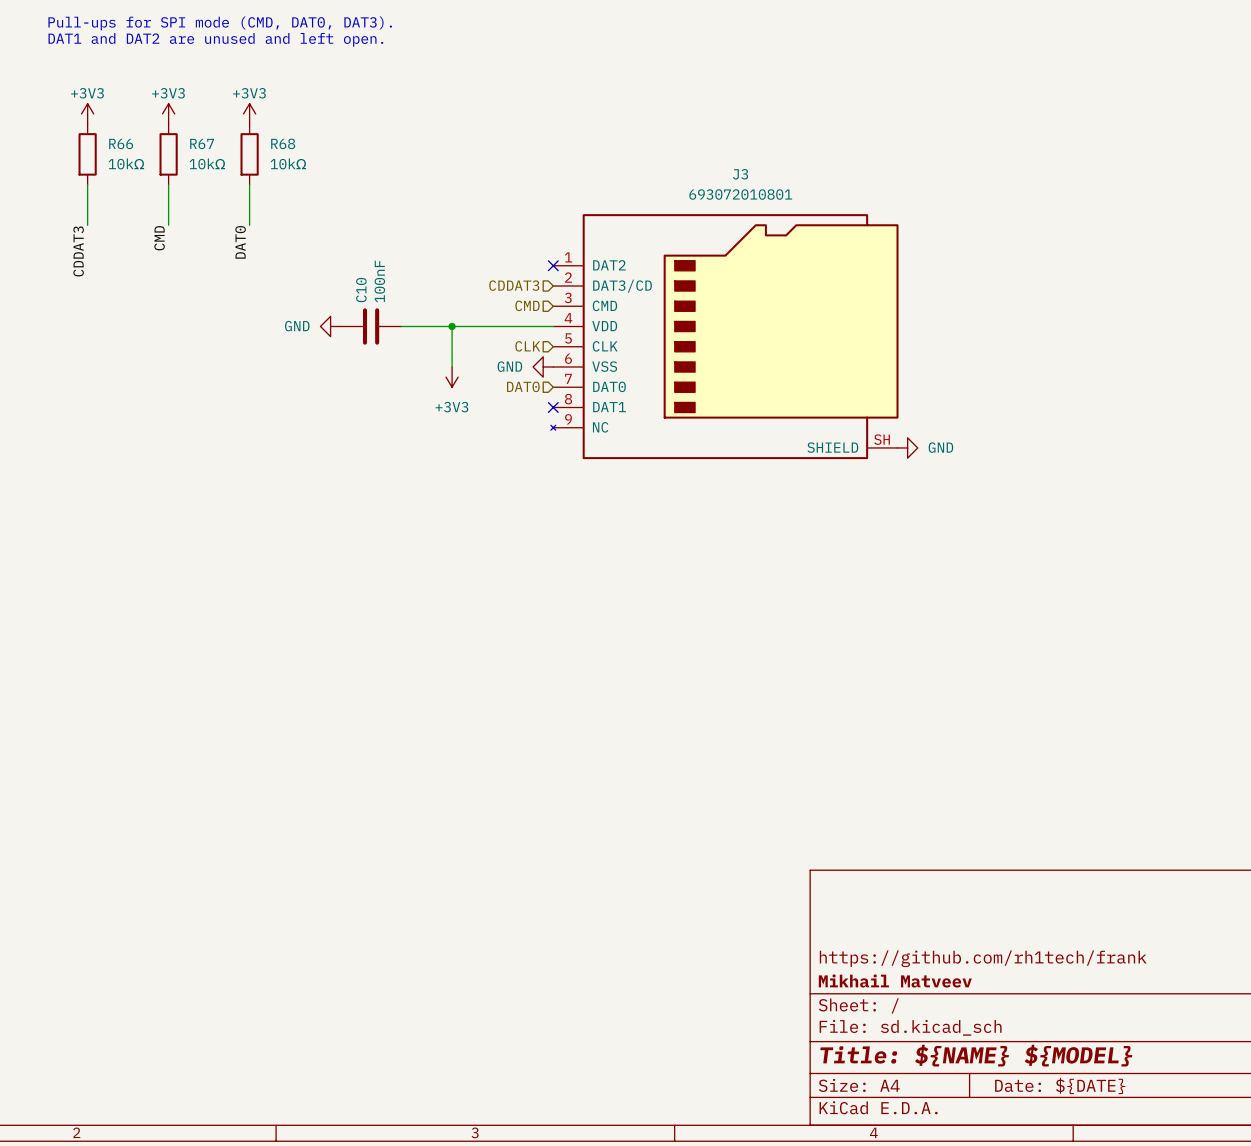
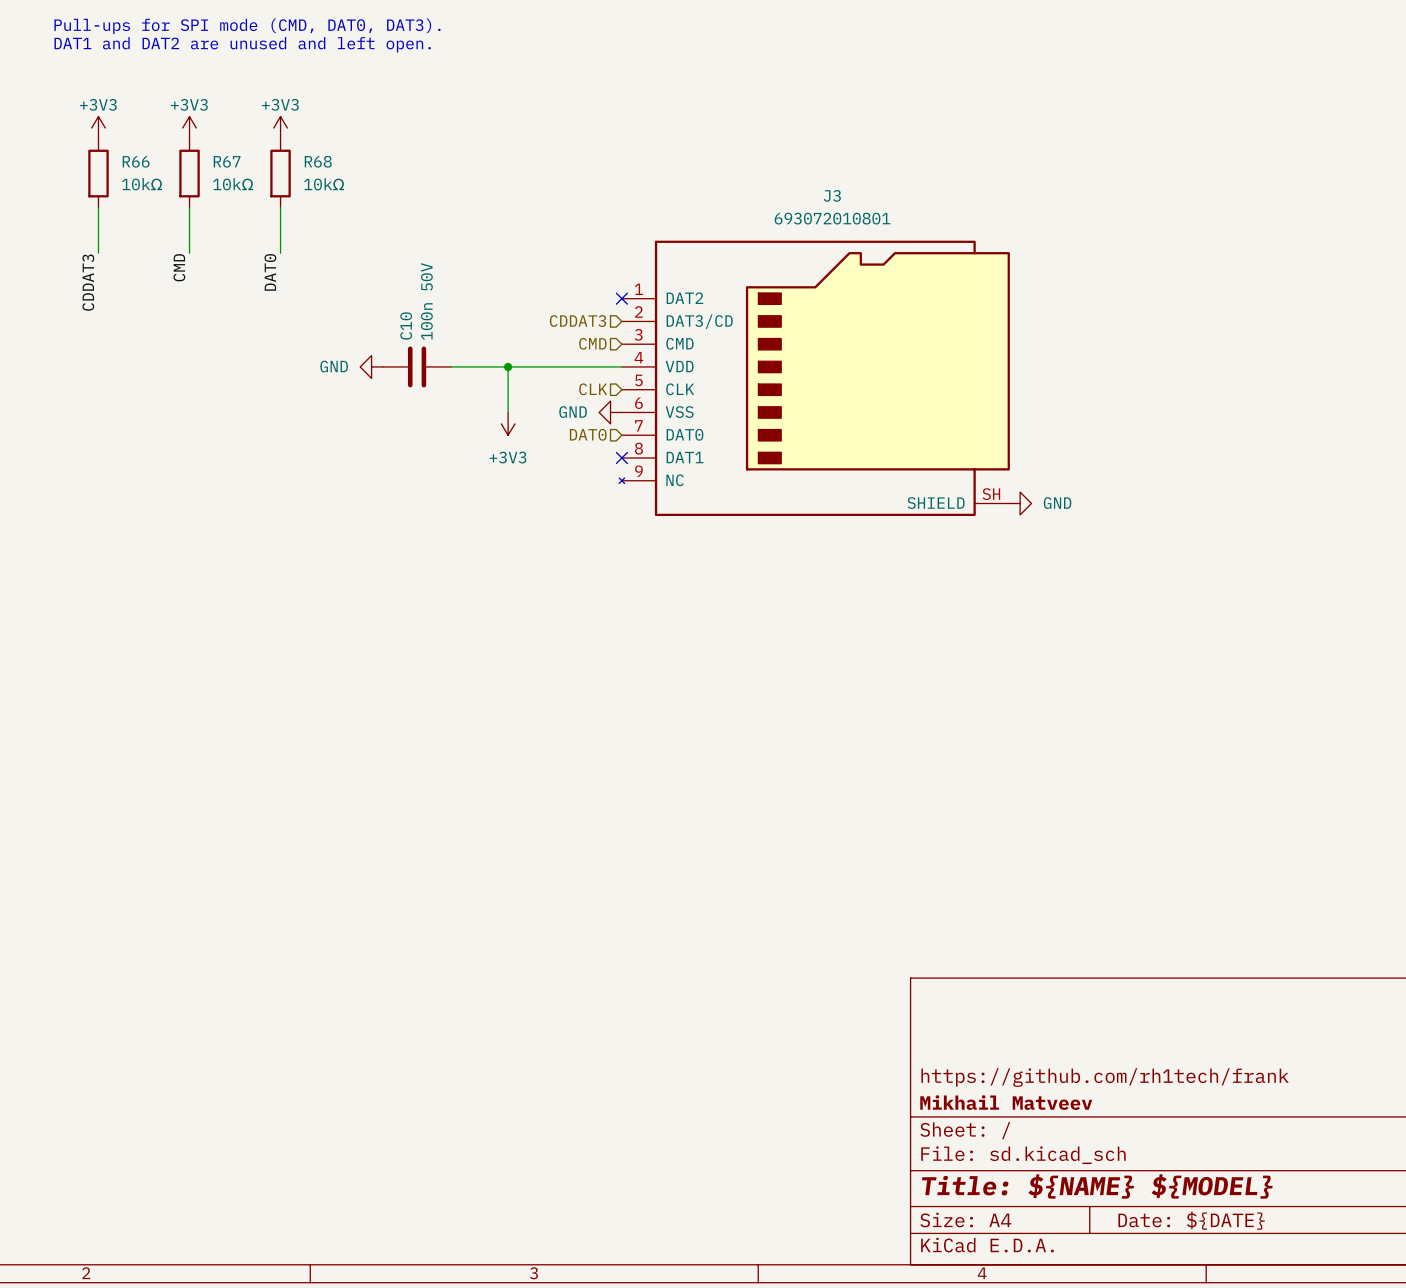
C10 value: 100nF (379, 281) -> 100n 50V (426, 301)

